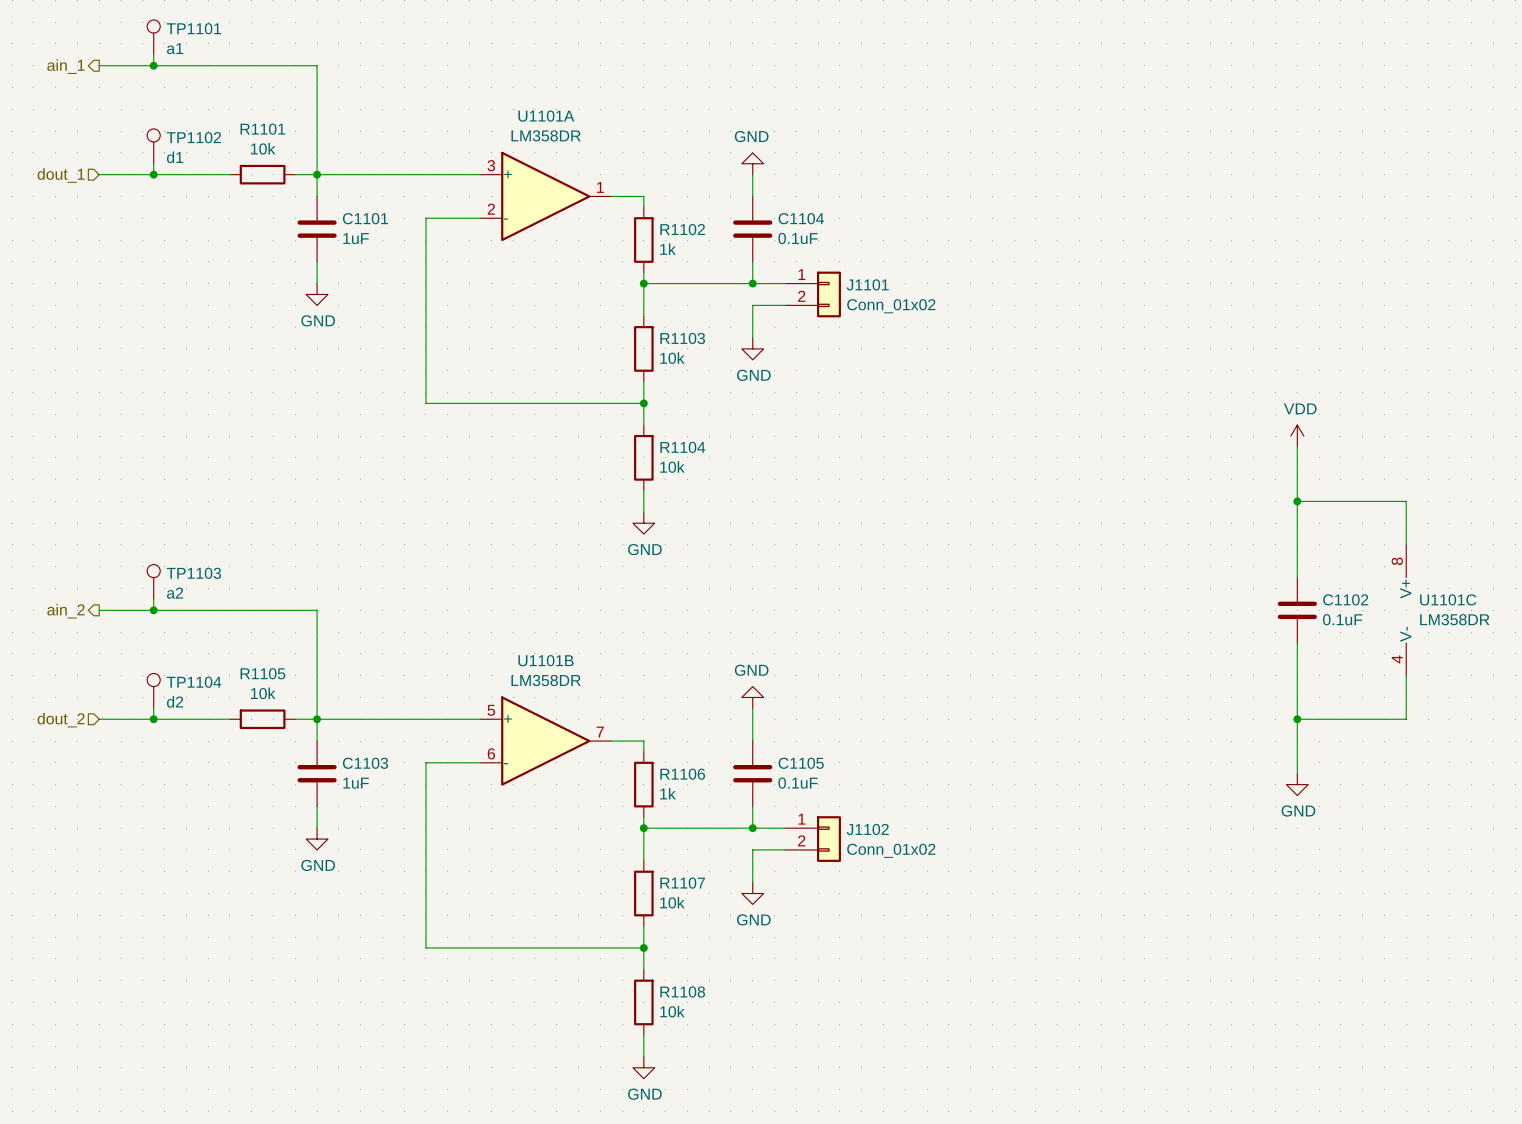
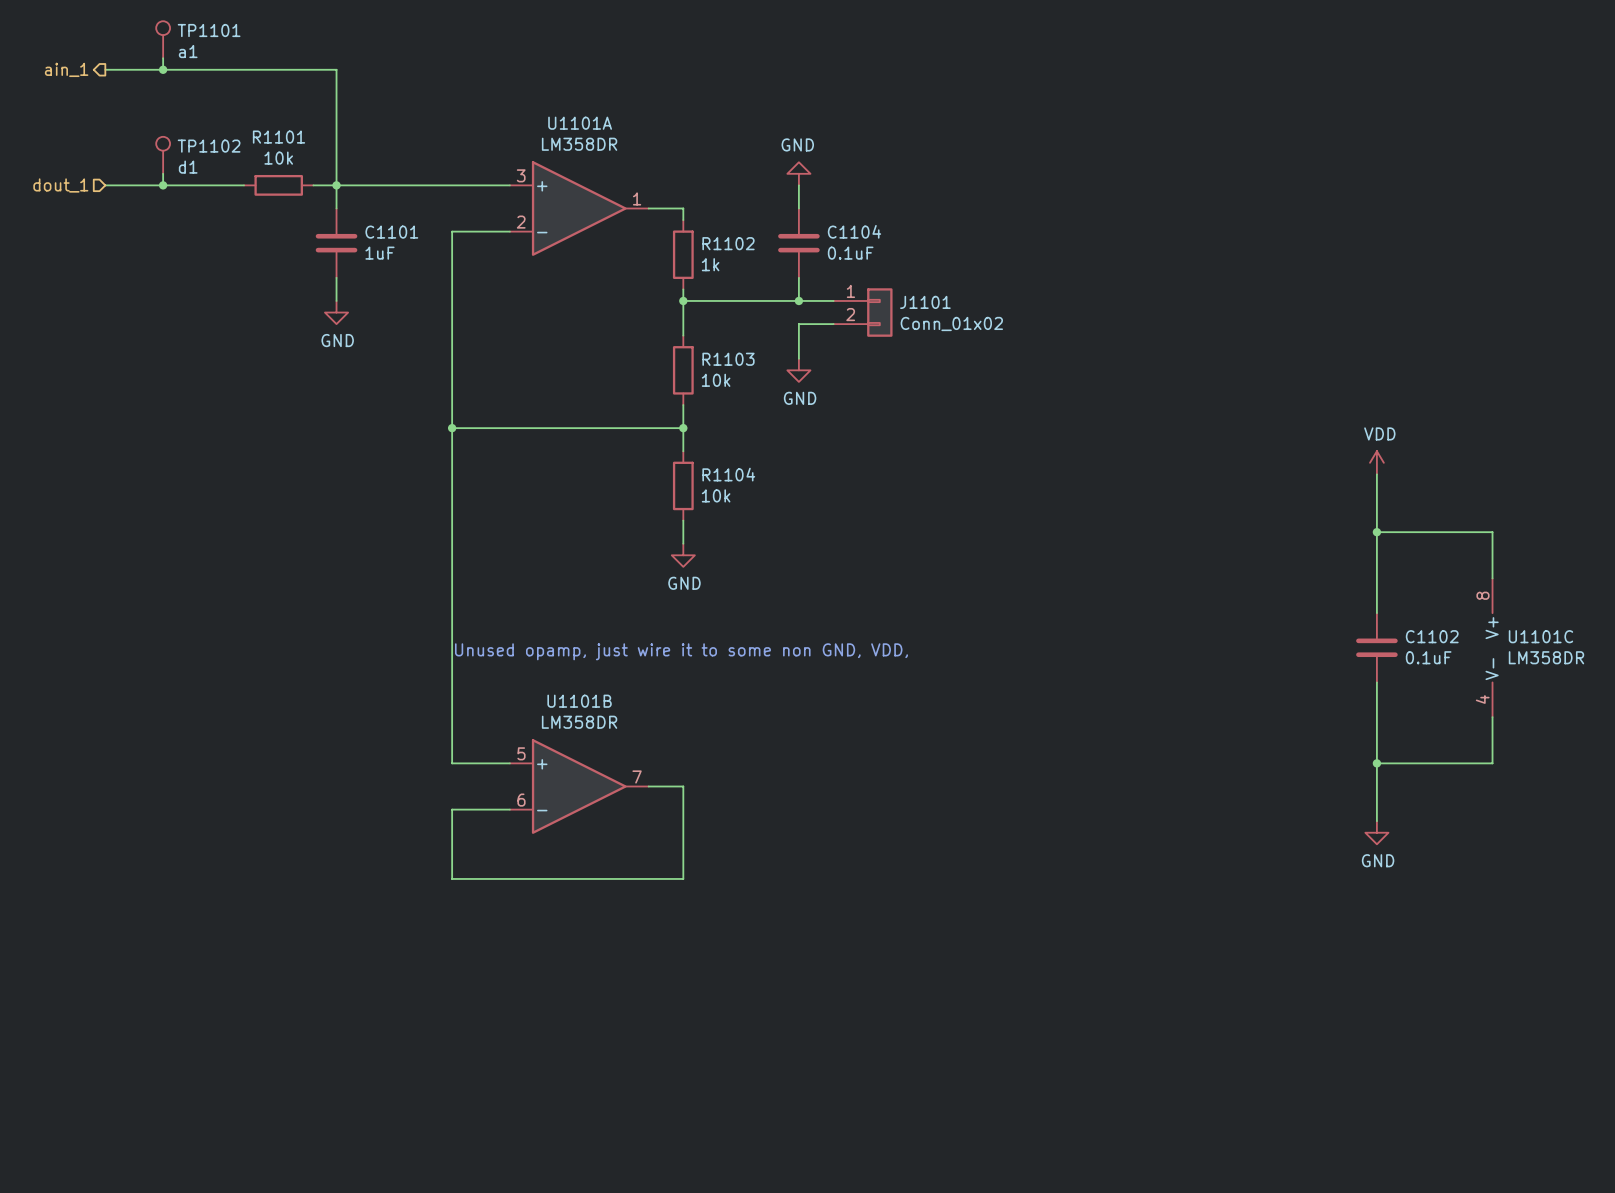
junction: none -> (452, 428)
TP1103: a2 (153, 582) -> none
wire: (153, 599) (153, 610) -> none
wire: (99, 610) (317, 610) (317, 741) -> none
junction: (153, 610) -> none
hierarchical label: ain_2 (65, 611) -> none
text: none -> Unused opamp, just wire it to some non GND, VDD, (681, 651)
TP1104: d2 (153, 690) -> none
power symbol: GND (752, 697) -> none
wire: (153, 708) (153, 719) -> none
wire: (752, 708) (752, 741) -> none
wire: (99, 719) (229, 719) -> none
junction: (153, 719) -> none
R1105: 10k (262, 719) -> none
wire: (295, 719) (425, 719) -> (452, 428) (452, 763)
junction: (317, 719) -> none
hierarchical label: dout_2 (61, 720) -> none
wire: none -> (683, 798) (683, 867)
C1103: 1uF (317, 773) -> none
C1105: 0.1uF (752, 773) -> none
R1106: 1k (643, 784) -> none
wire: (317, 806) (317, 828) -> none
wire: (752, 806) (752, 828) -> none
wire: (425, 828) (425, 947) (643, 947) -> (452, 878) (683, 878)
junction: (643, 828) -> none
junction: (752, 828) -> none
wire: (785, 828) (643, 828) (643, 860) -> none
power symbol: GND (317, 839) -> none
J1102: Conn_01x02 (813, 839) -> none
wire: (785, 849) (752, 849) (752, 882) -> none
R1107: 10k (643, 893) -> none
power symbol: GND (752, 893) -> none
wire: (643, 926) (643, 969) -> none
junction: (643, 947) -> none
R1108: 10k (643, 1002) -> none
wire: (643, 1035) (643, 1056) -> none
power symbol: GND (643, 1067) -> none

